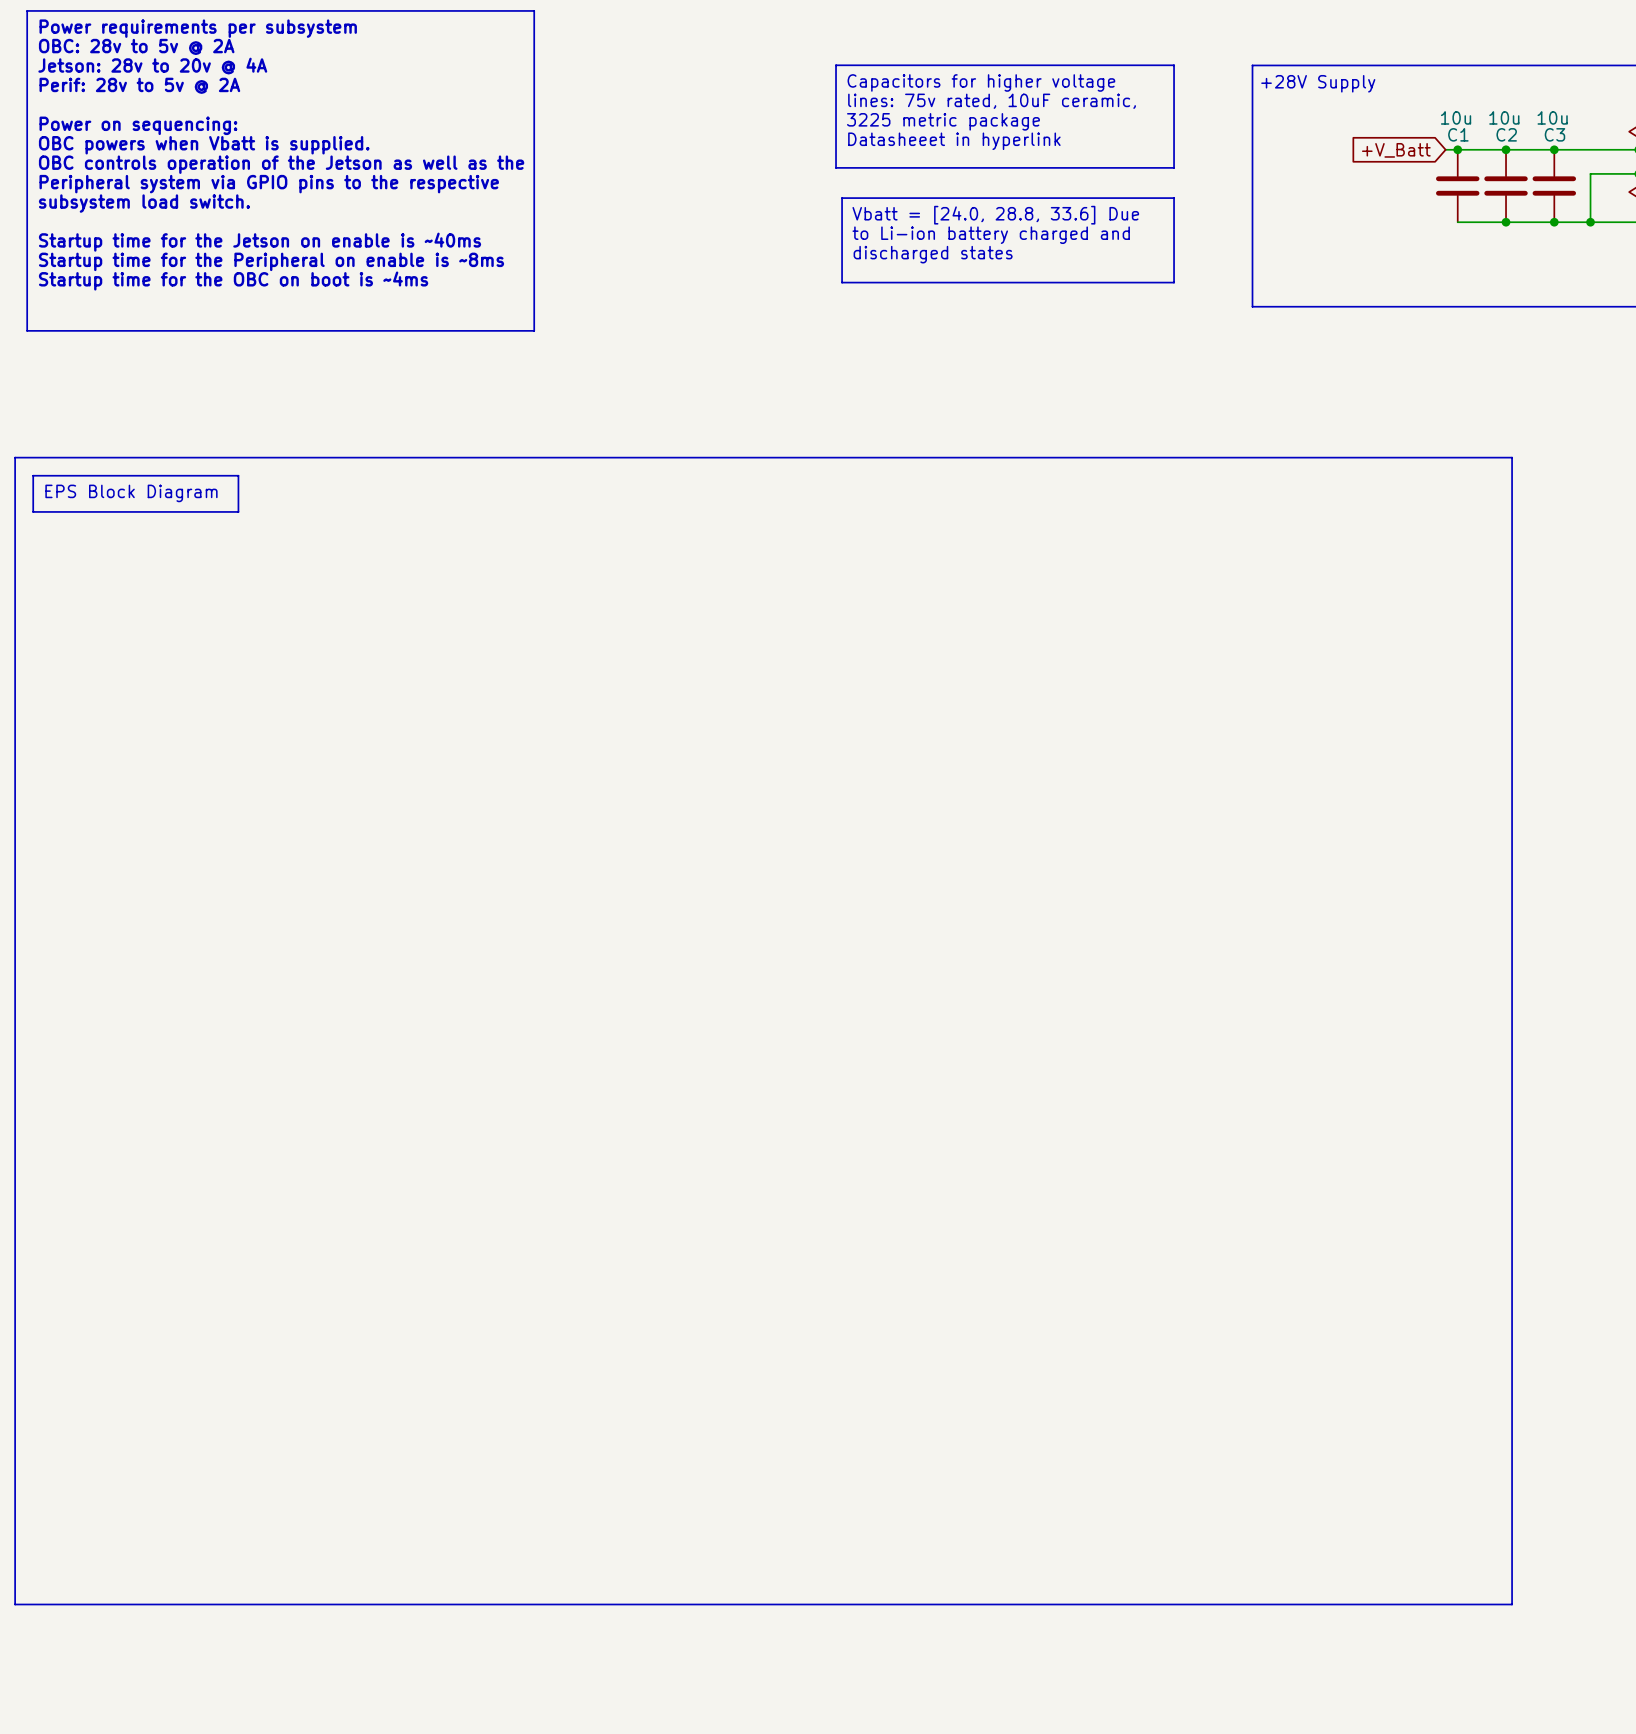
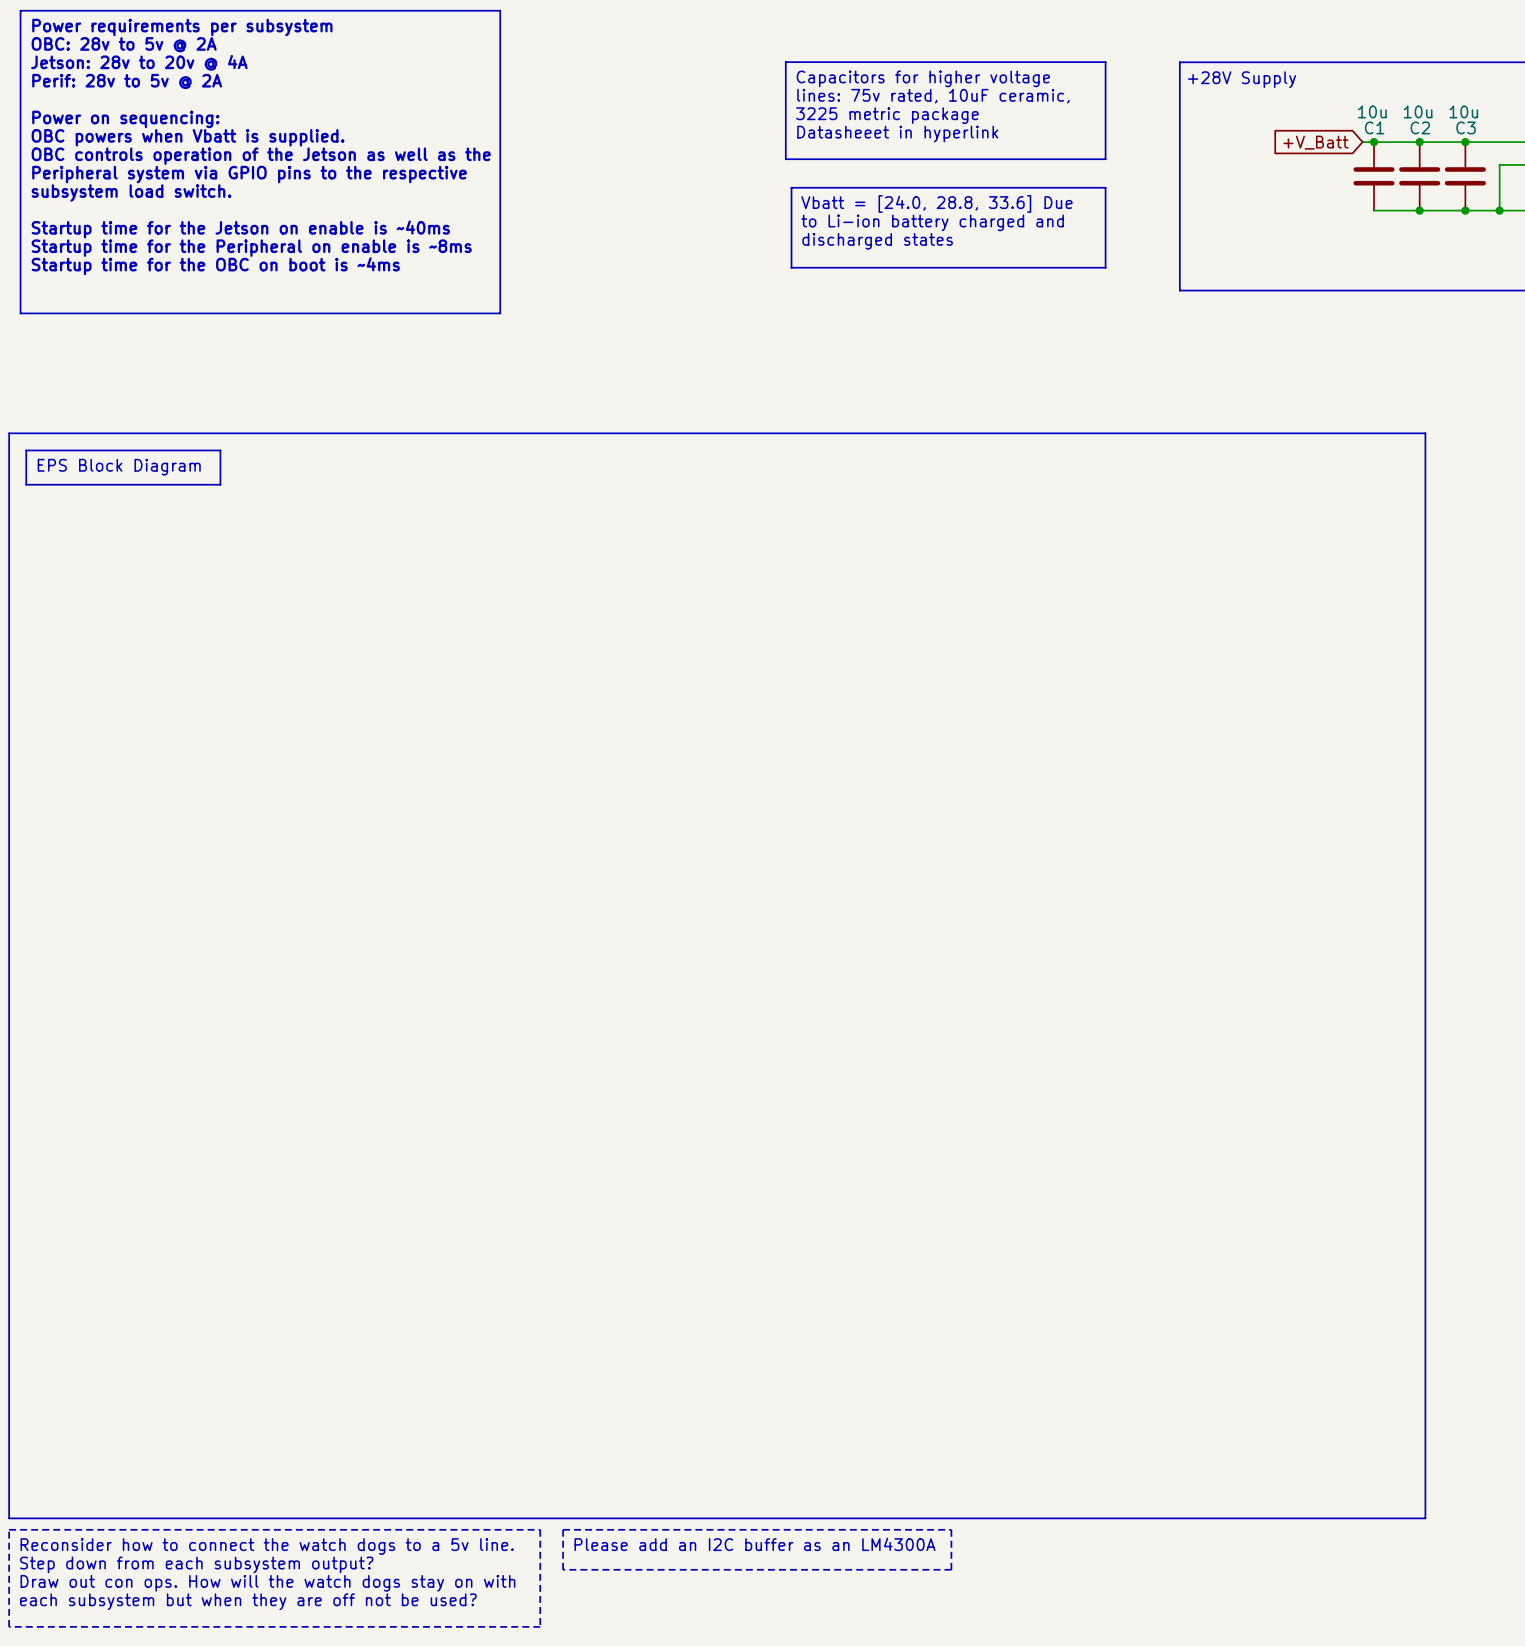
line: none -> (9, 1529) (540, 1529) (540, 1626) (9, 1626) (9, 1529)
line: none -> (563, 1529) (951, 1529) (951, 1569) (563, 1569) (563, 1529)
text: none -> Please add an I2C buffer as an LM4300A (755, 1544)
text: none -> Reconsider how to connect the watch dogs to a 5v line. (267, 1546)
text: none -> Step down from each subsystem output? (196, 1564)
text: none -> Draw out con ops. How will the watch dogs stay on with (267, 1583)
text: none -> each subsystem but when they are off not be used? (248, 1601)

